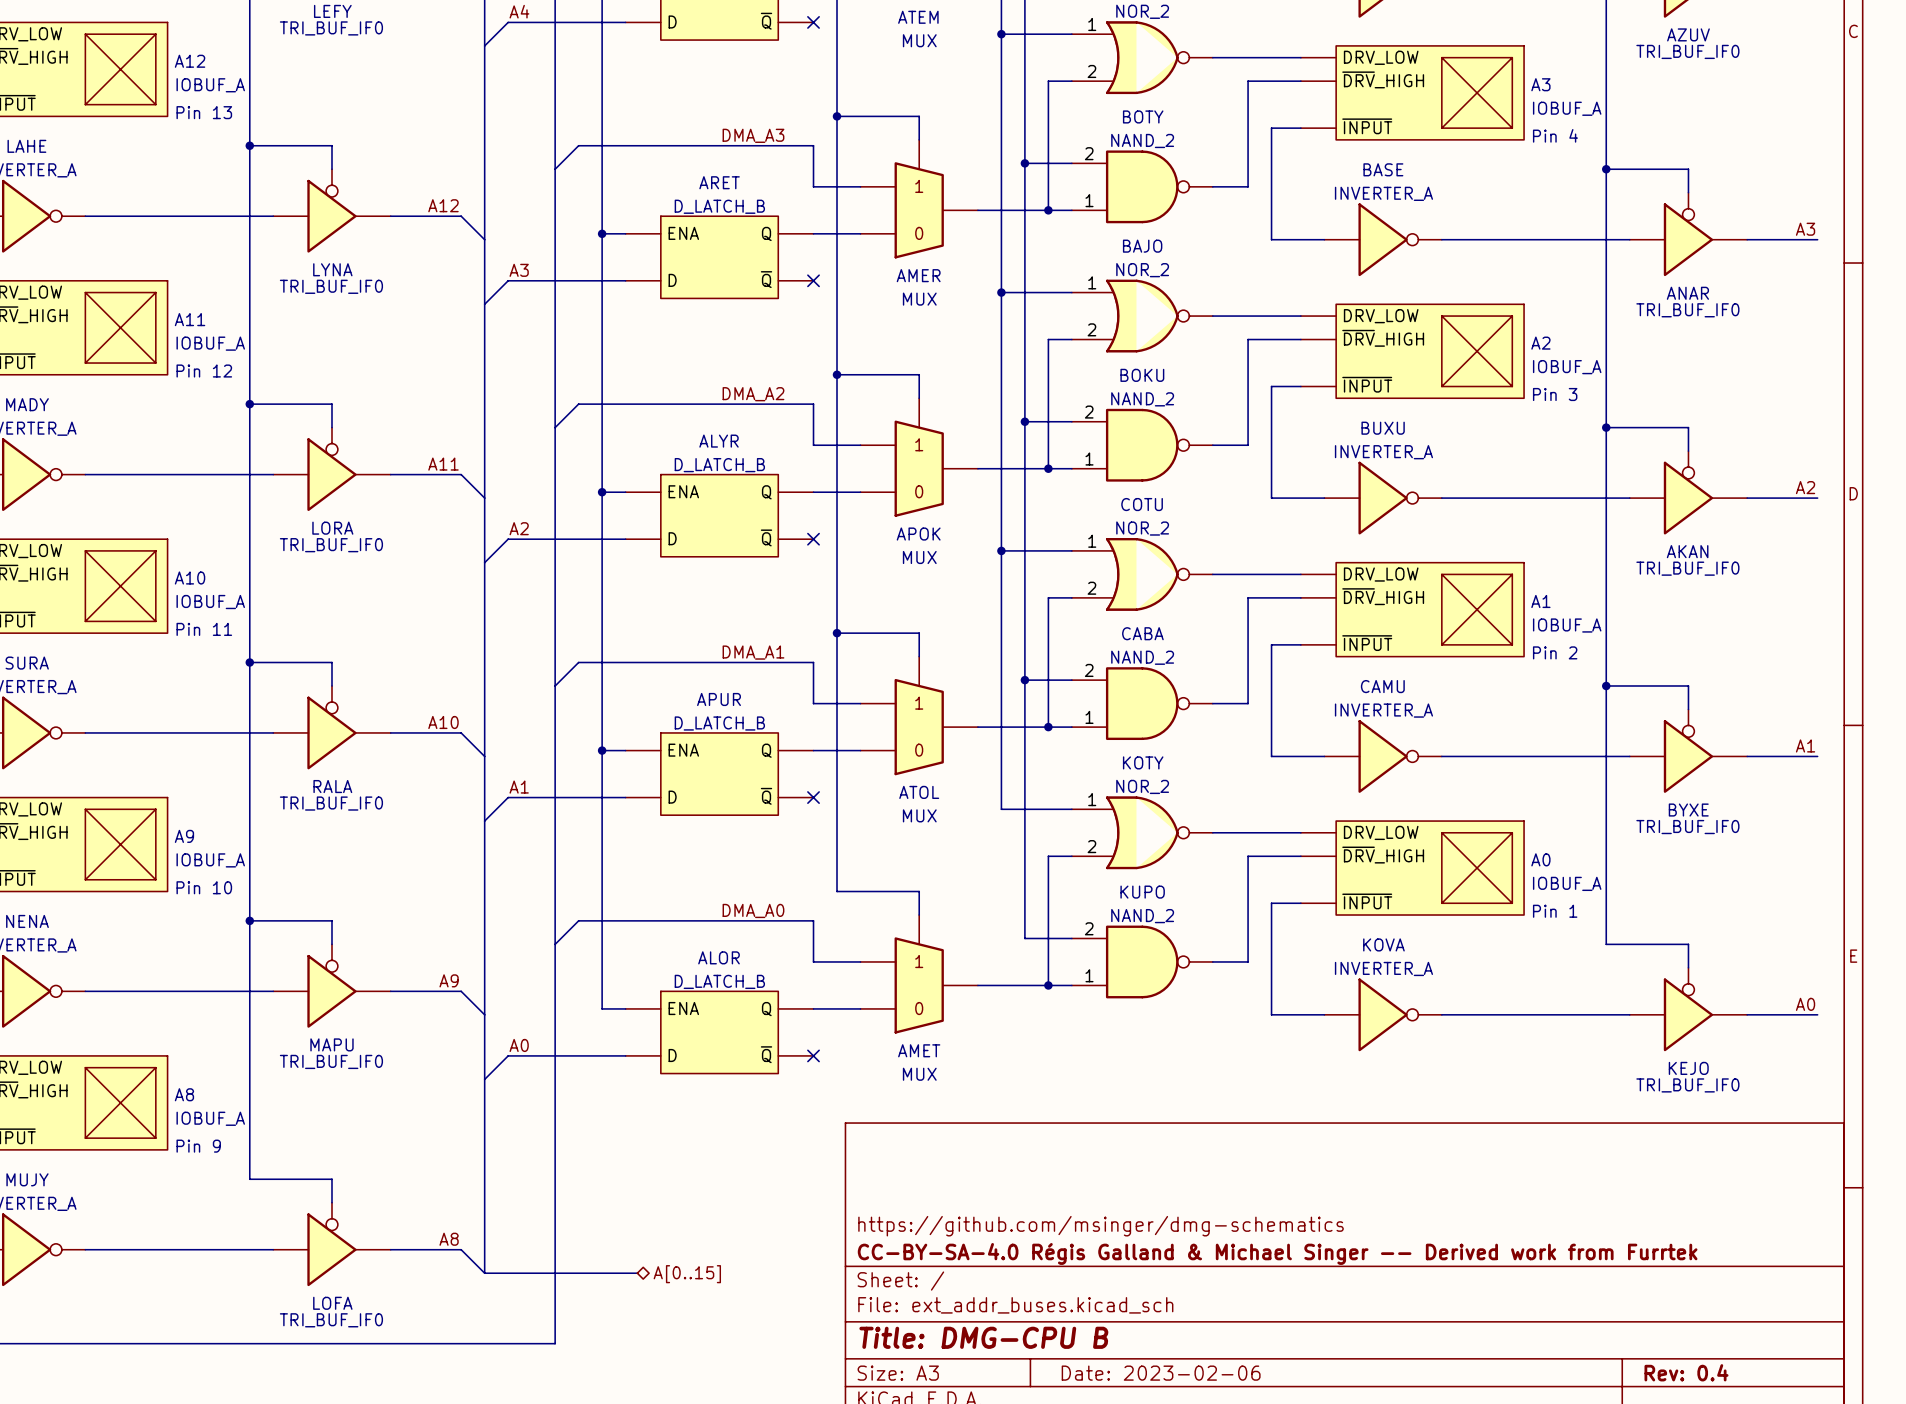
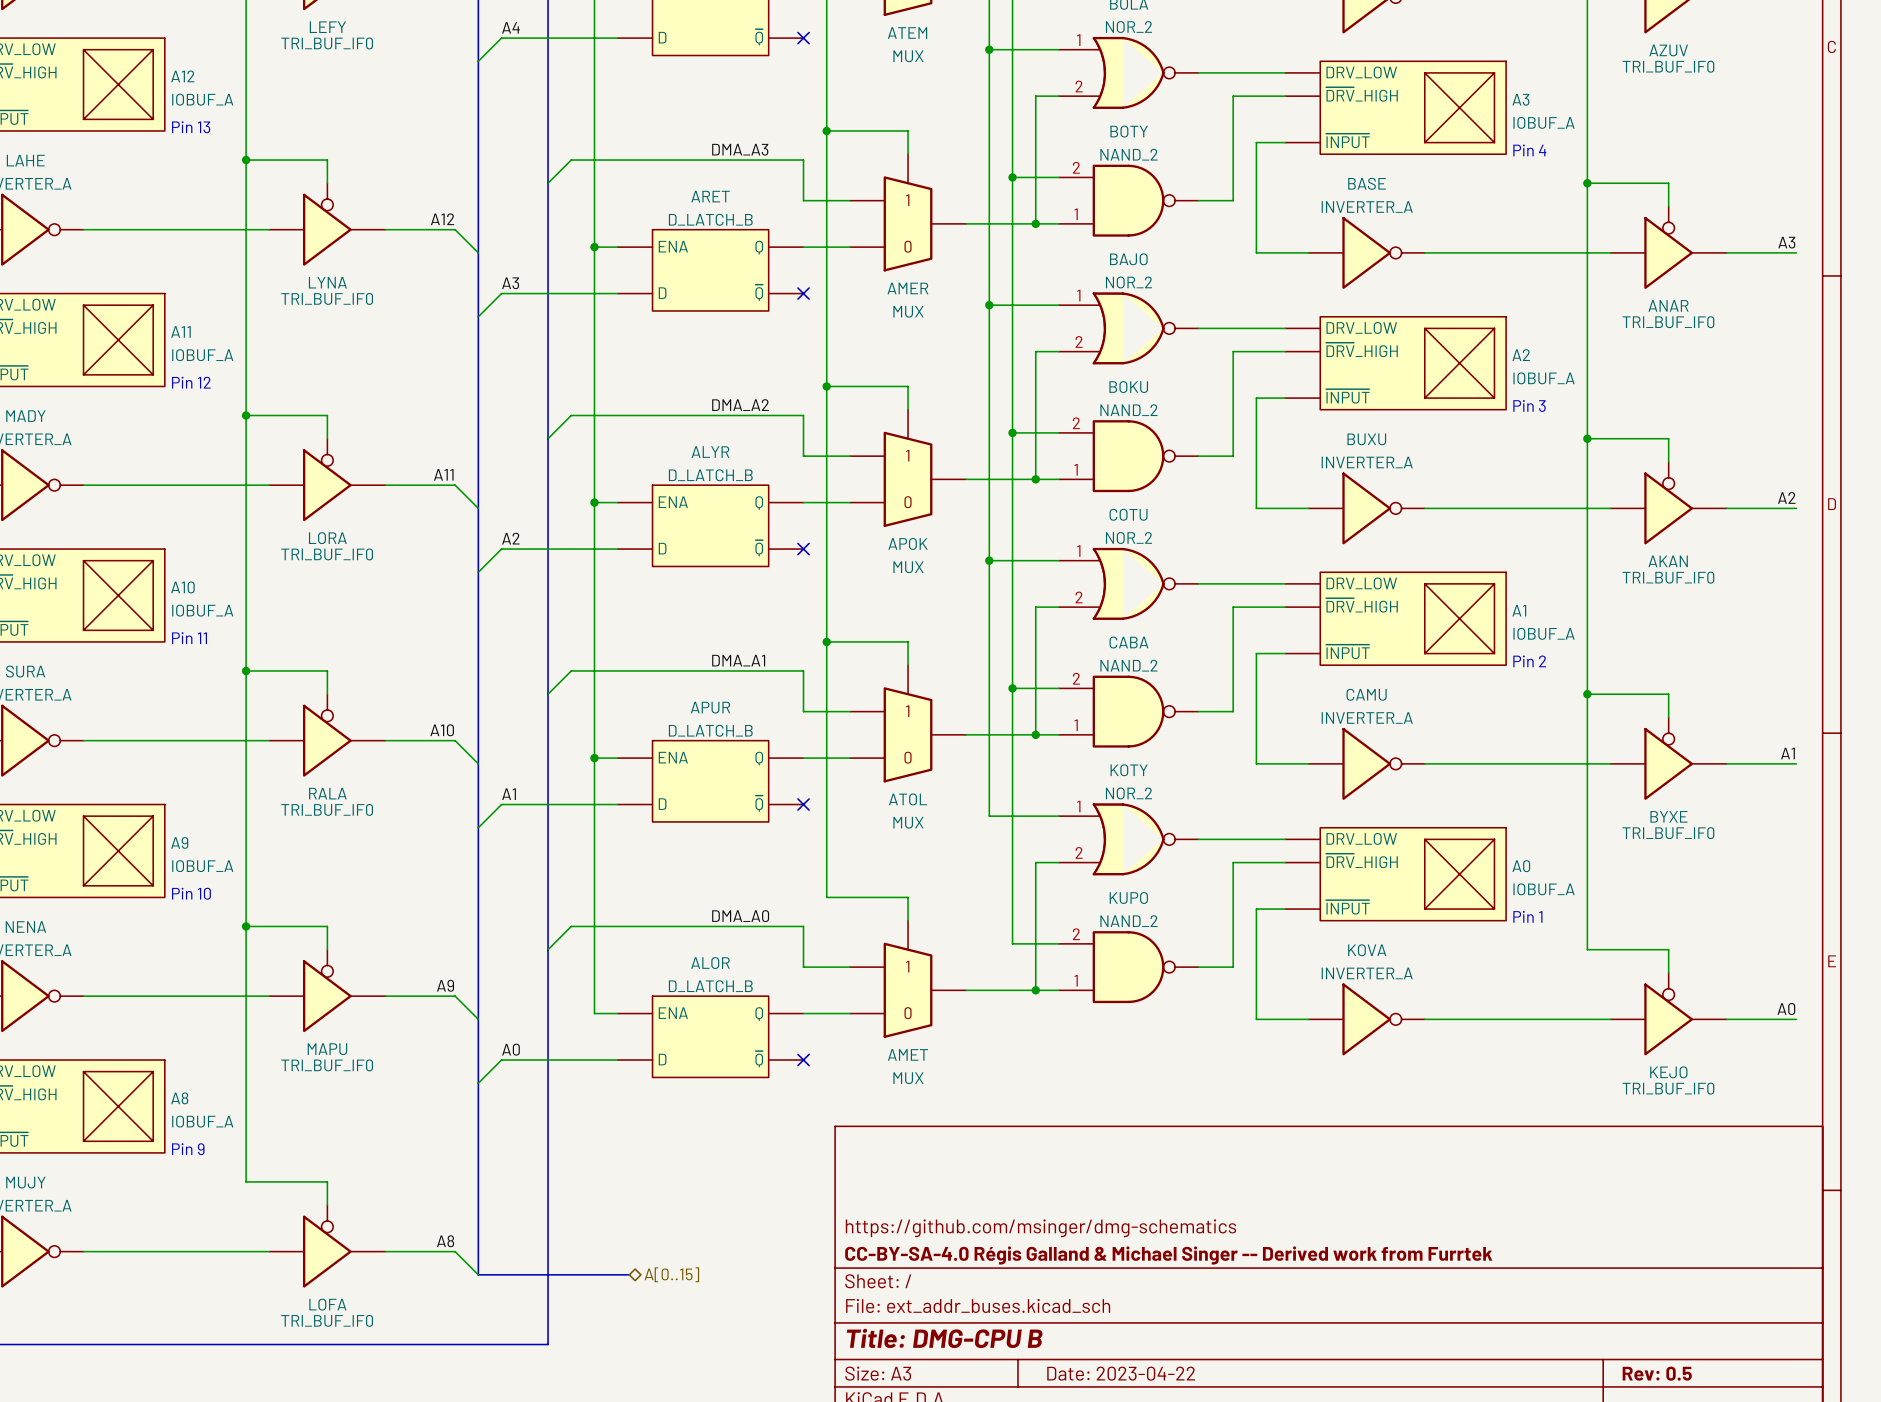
title block: Rev: 0.4 (1686, 1372) -> Rev: 0.5 (1657, 1373)
title block: Date: 2023-02-06 (1161, 1373) -> Date: 2023-04-22 (1121, 1373)

